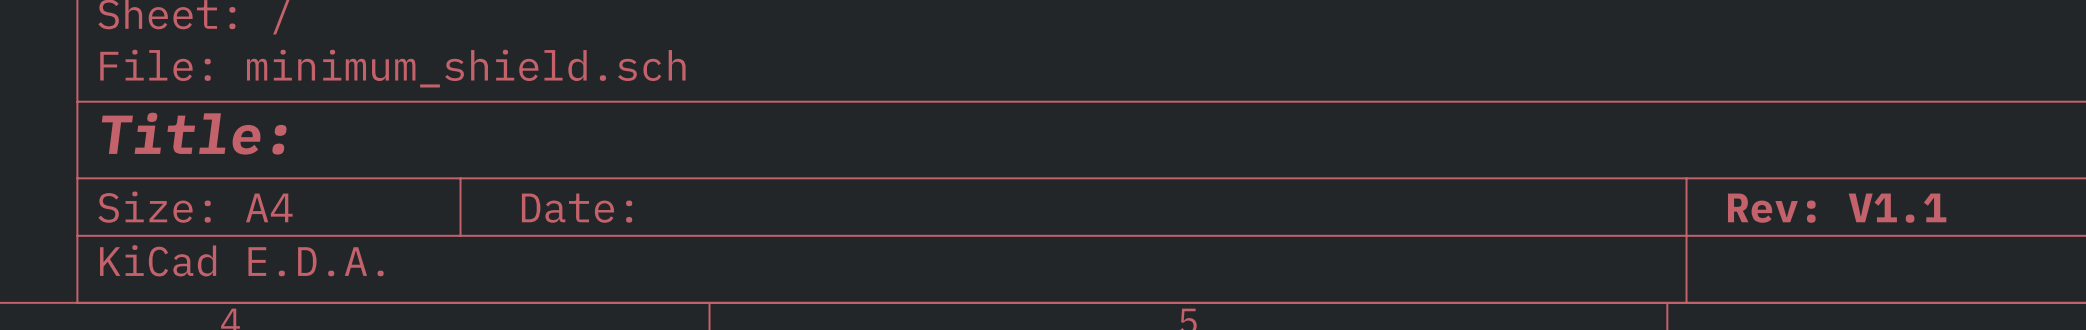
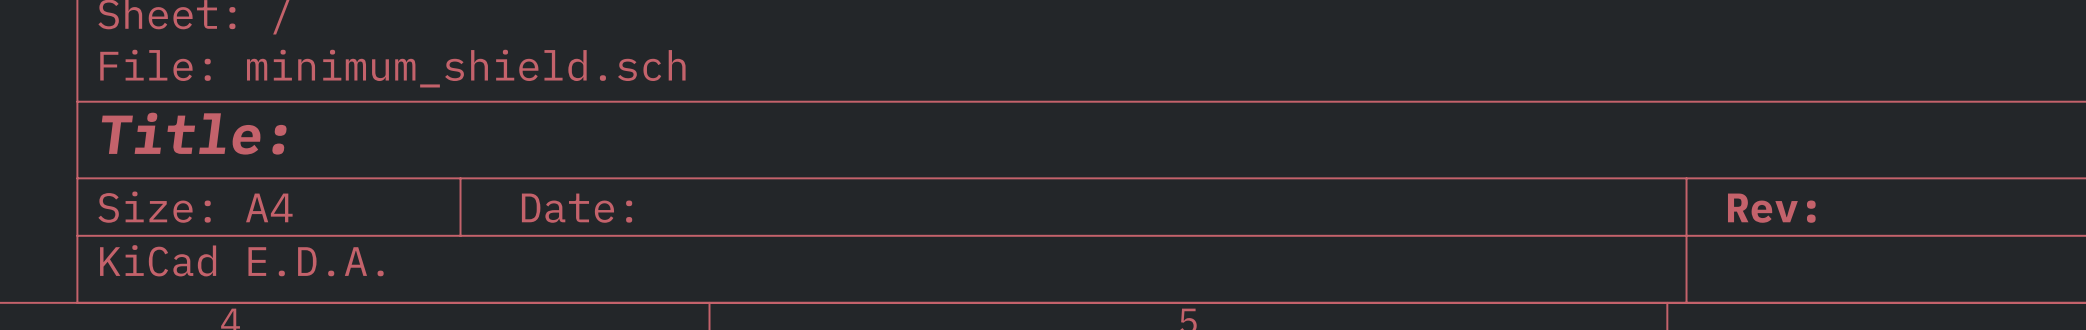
title block: Rev: V1.1 (1837, 208) -> Rev: (1771, 208)

